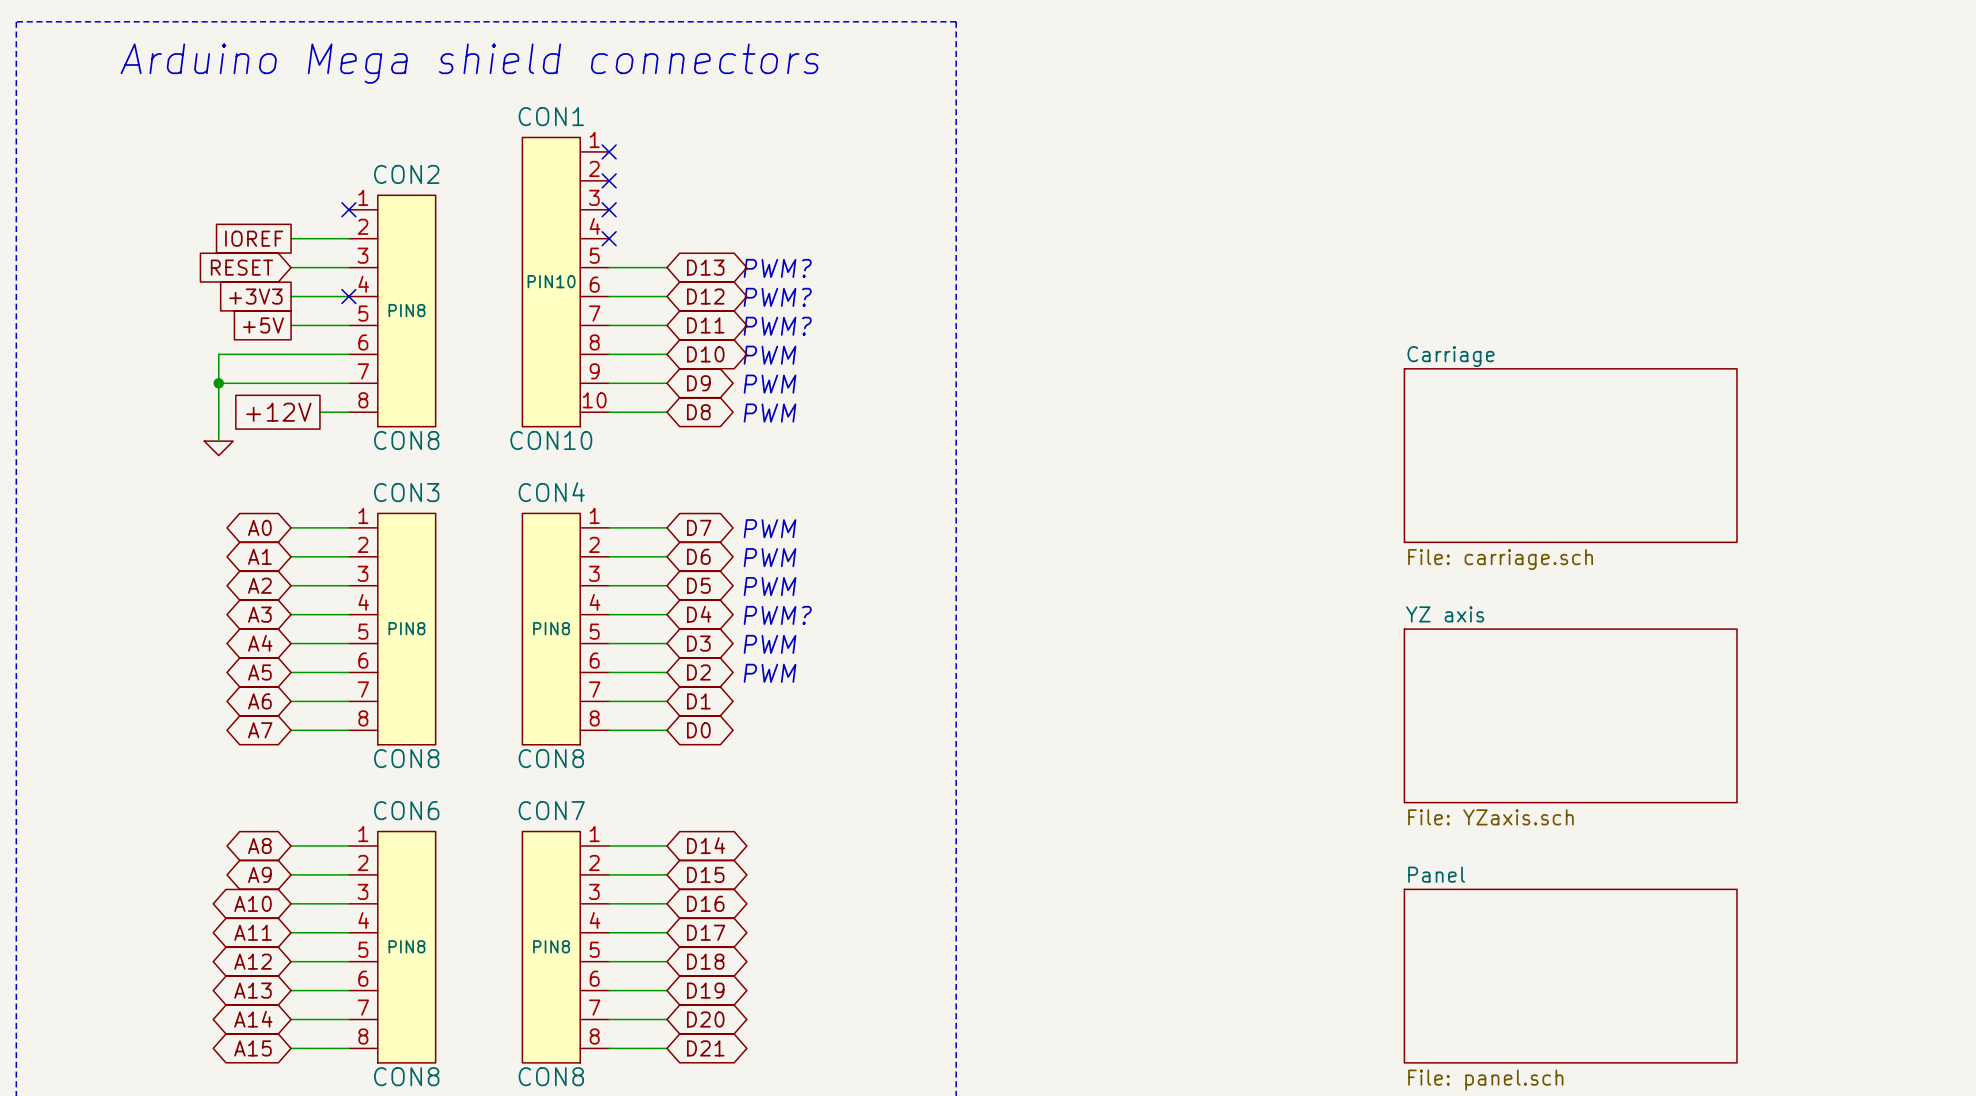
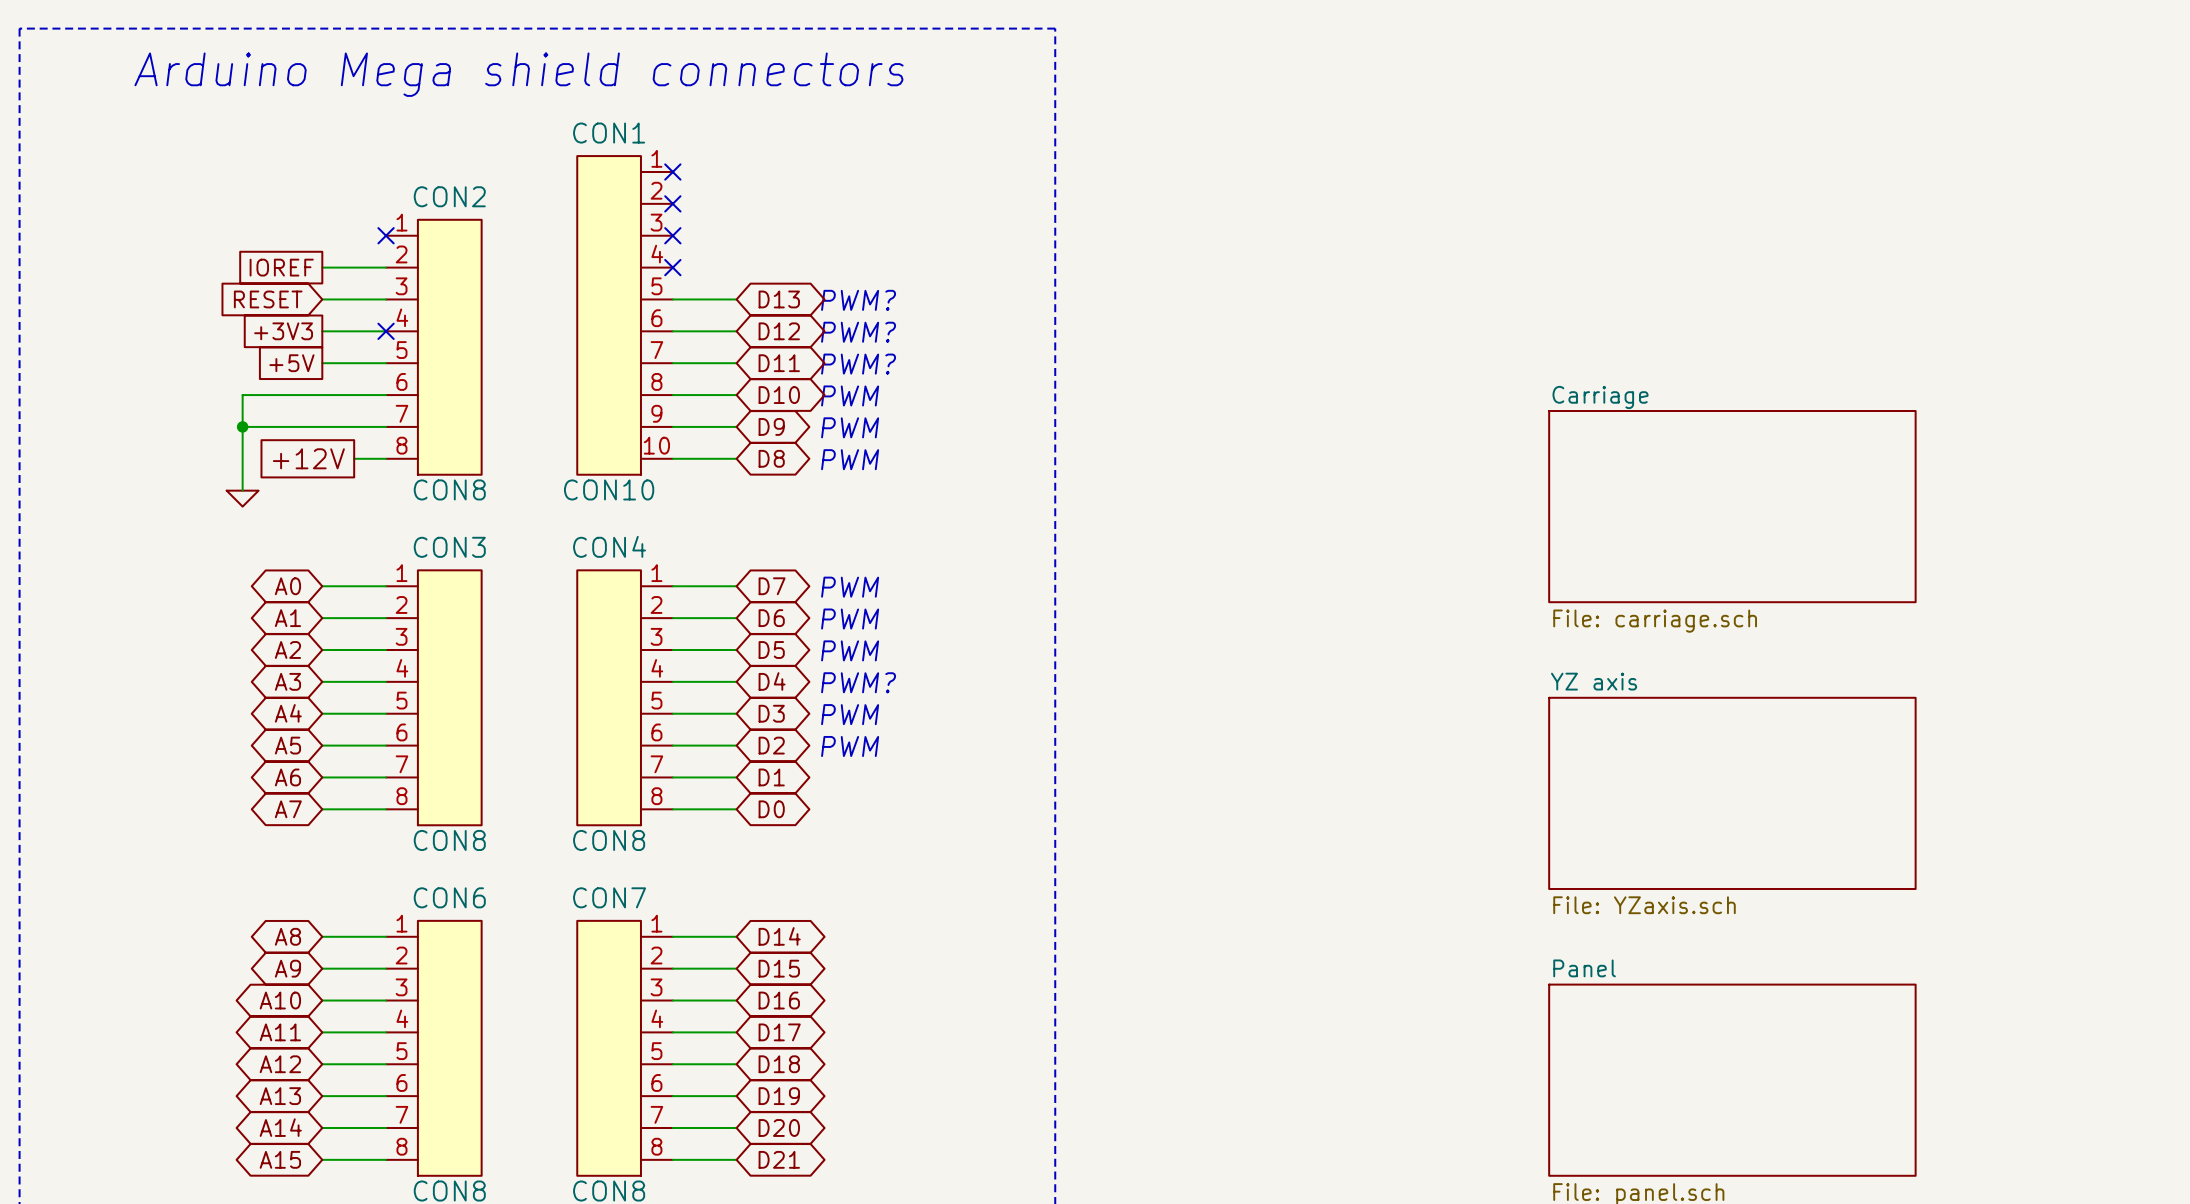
CON1 text: PIN10 (551, 281) -> none
CON2 text: PIN8 (407, 310) -> none
CON3 text: PIN8 (407, 628) -> none
CON4 text: PIN8 (551, 628) -> none
CON6 text: PIN8 (407, 946) -> none
CON7 text: PIN8 (551, 946) -> none

